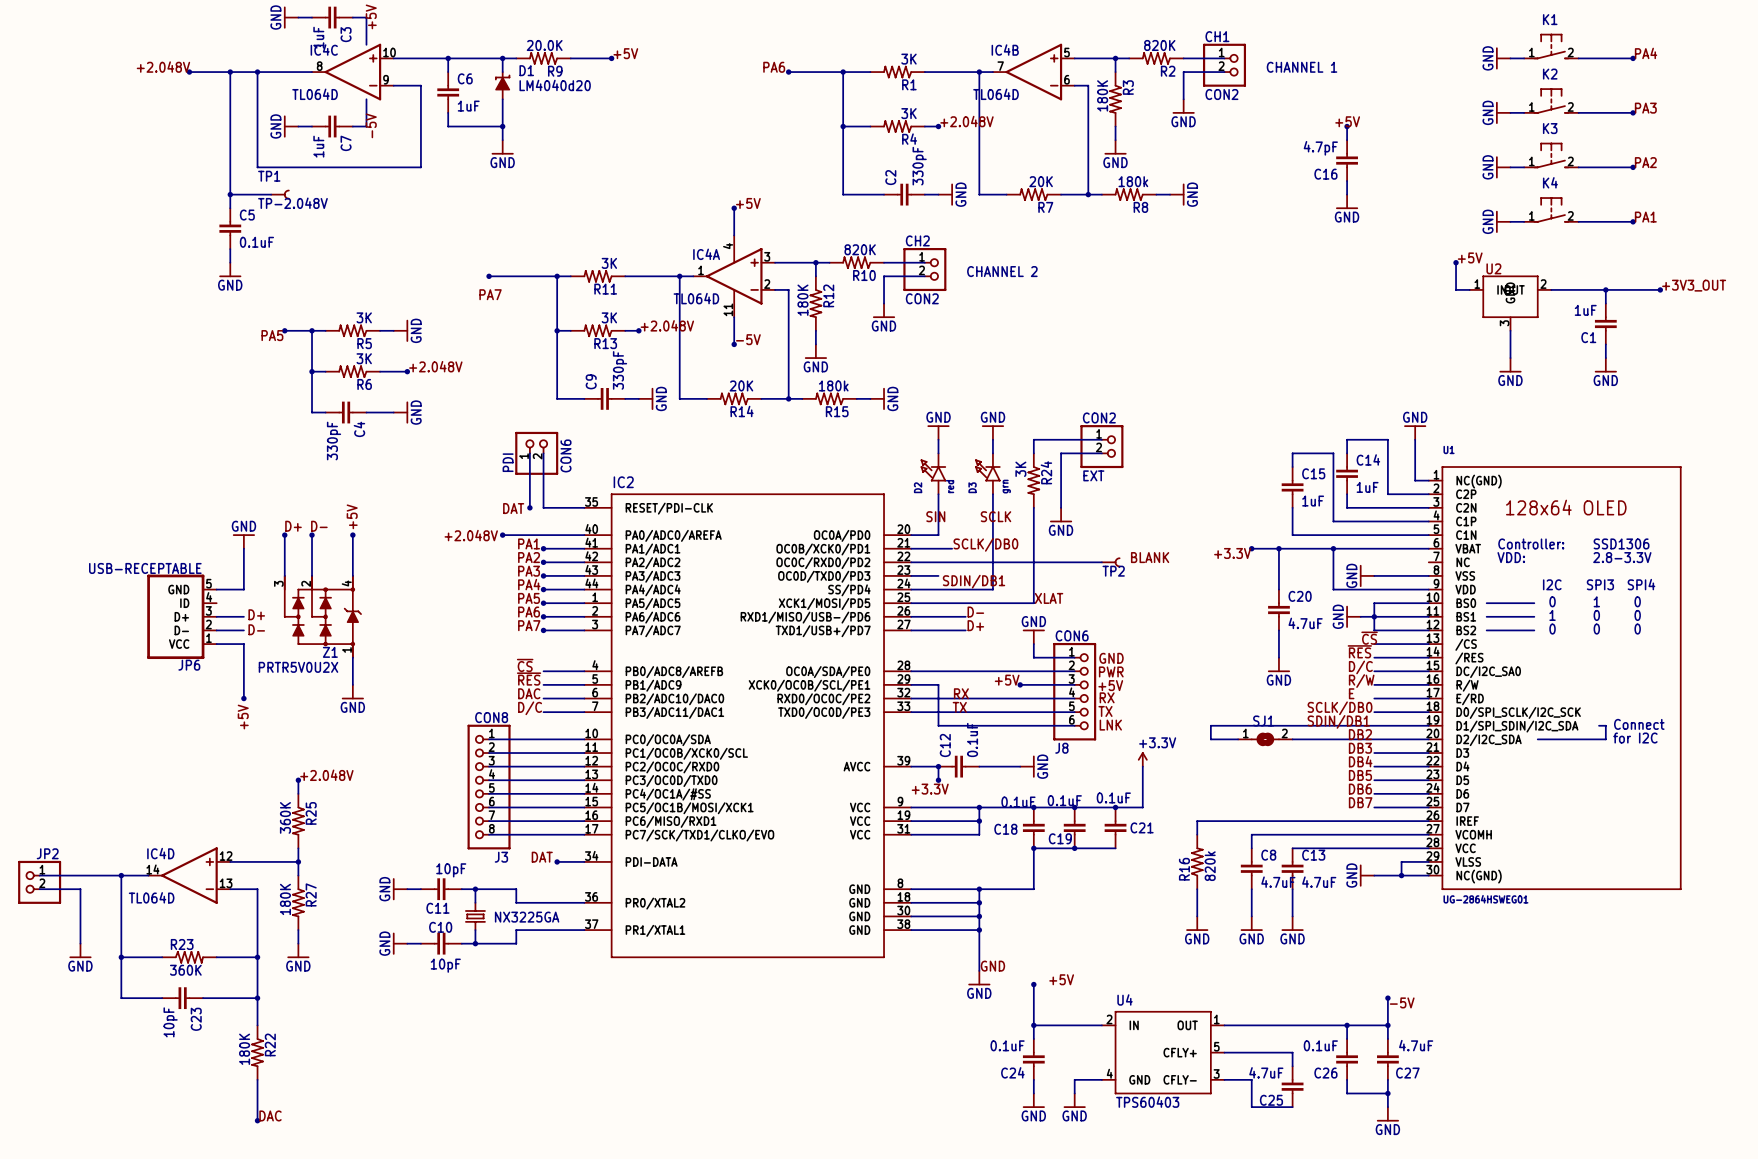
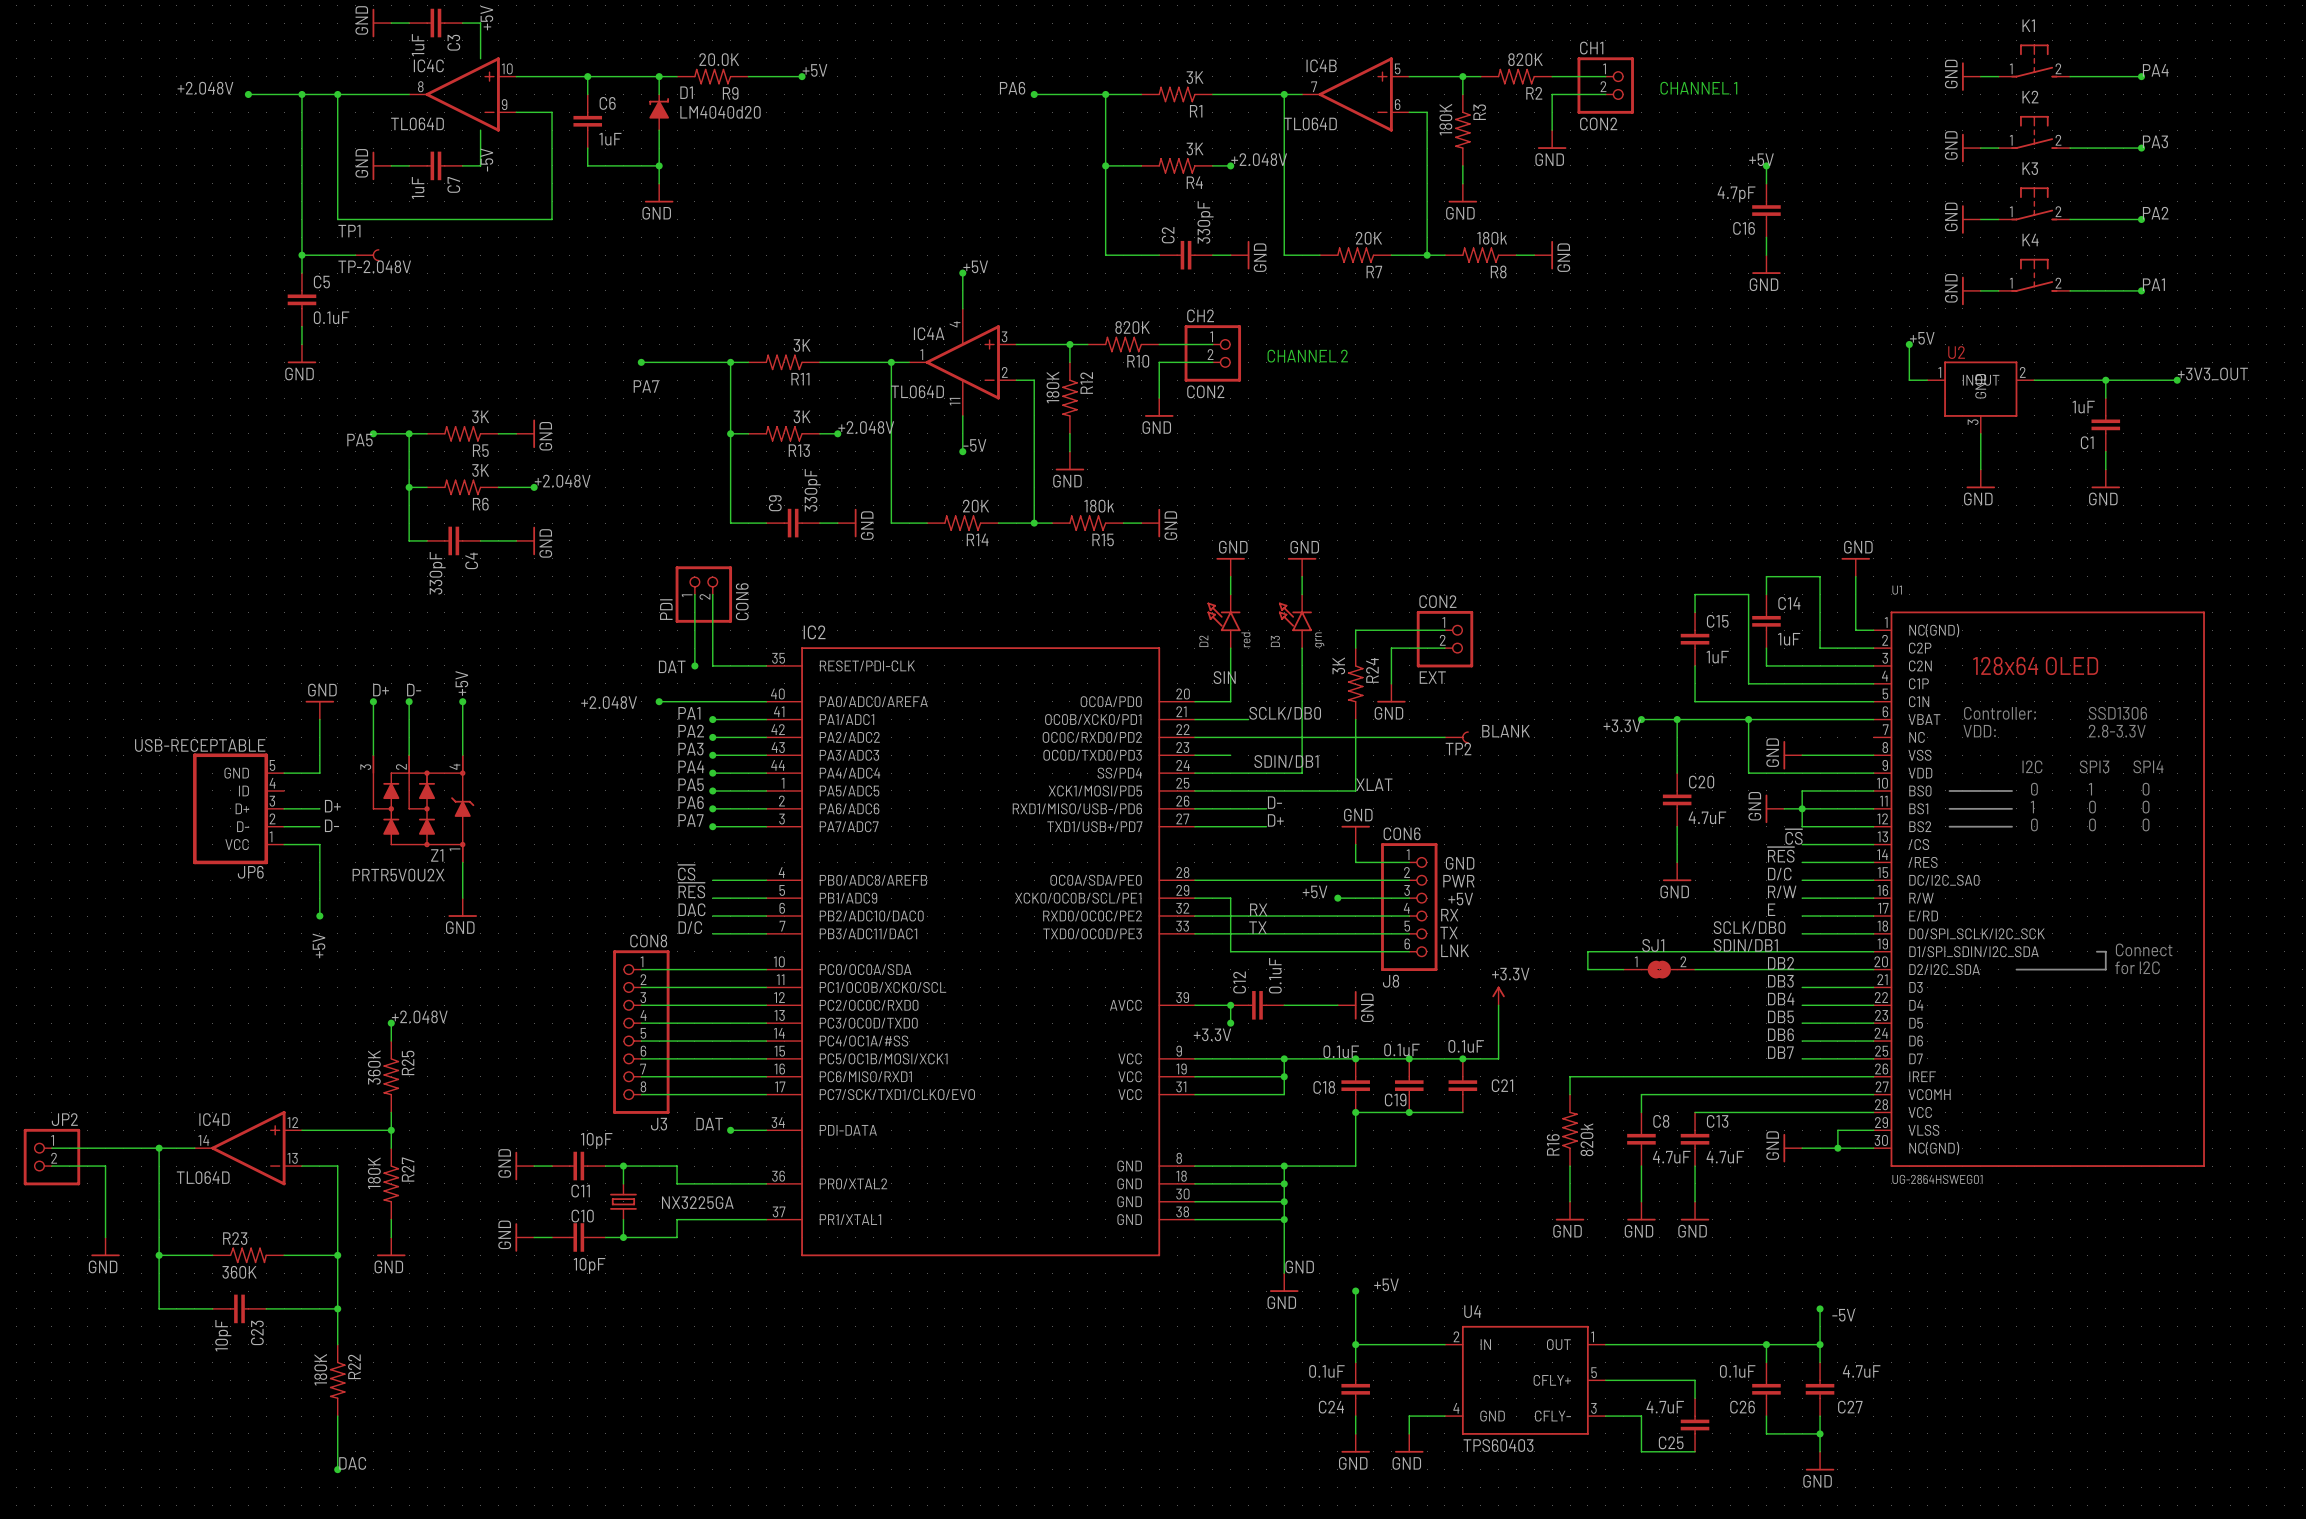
wire: (1101, 439) (1033, 439) (1033, 453) -> (1444, 630) (1355, 630) (1355, 648)
CON2 position: (1101, 446) -> (1444, 639)
wire: (1101, 453) (1061, 453) (1061, 494) -> (1444, 648) (1391, 648)
R24 position: (1033, 480) -> (1355, 683)
power symbol position: GND (1061, 515) -> GND (1391, 693)
label: SCLK (995, 516) -> none

